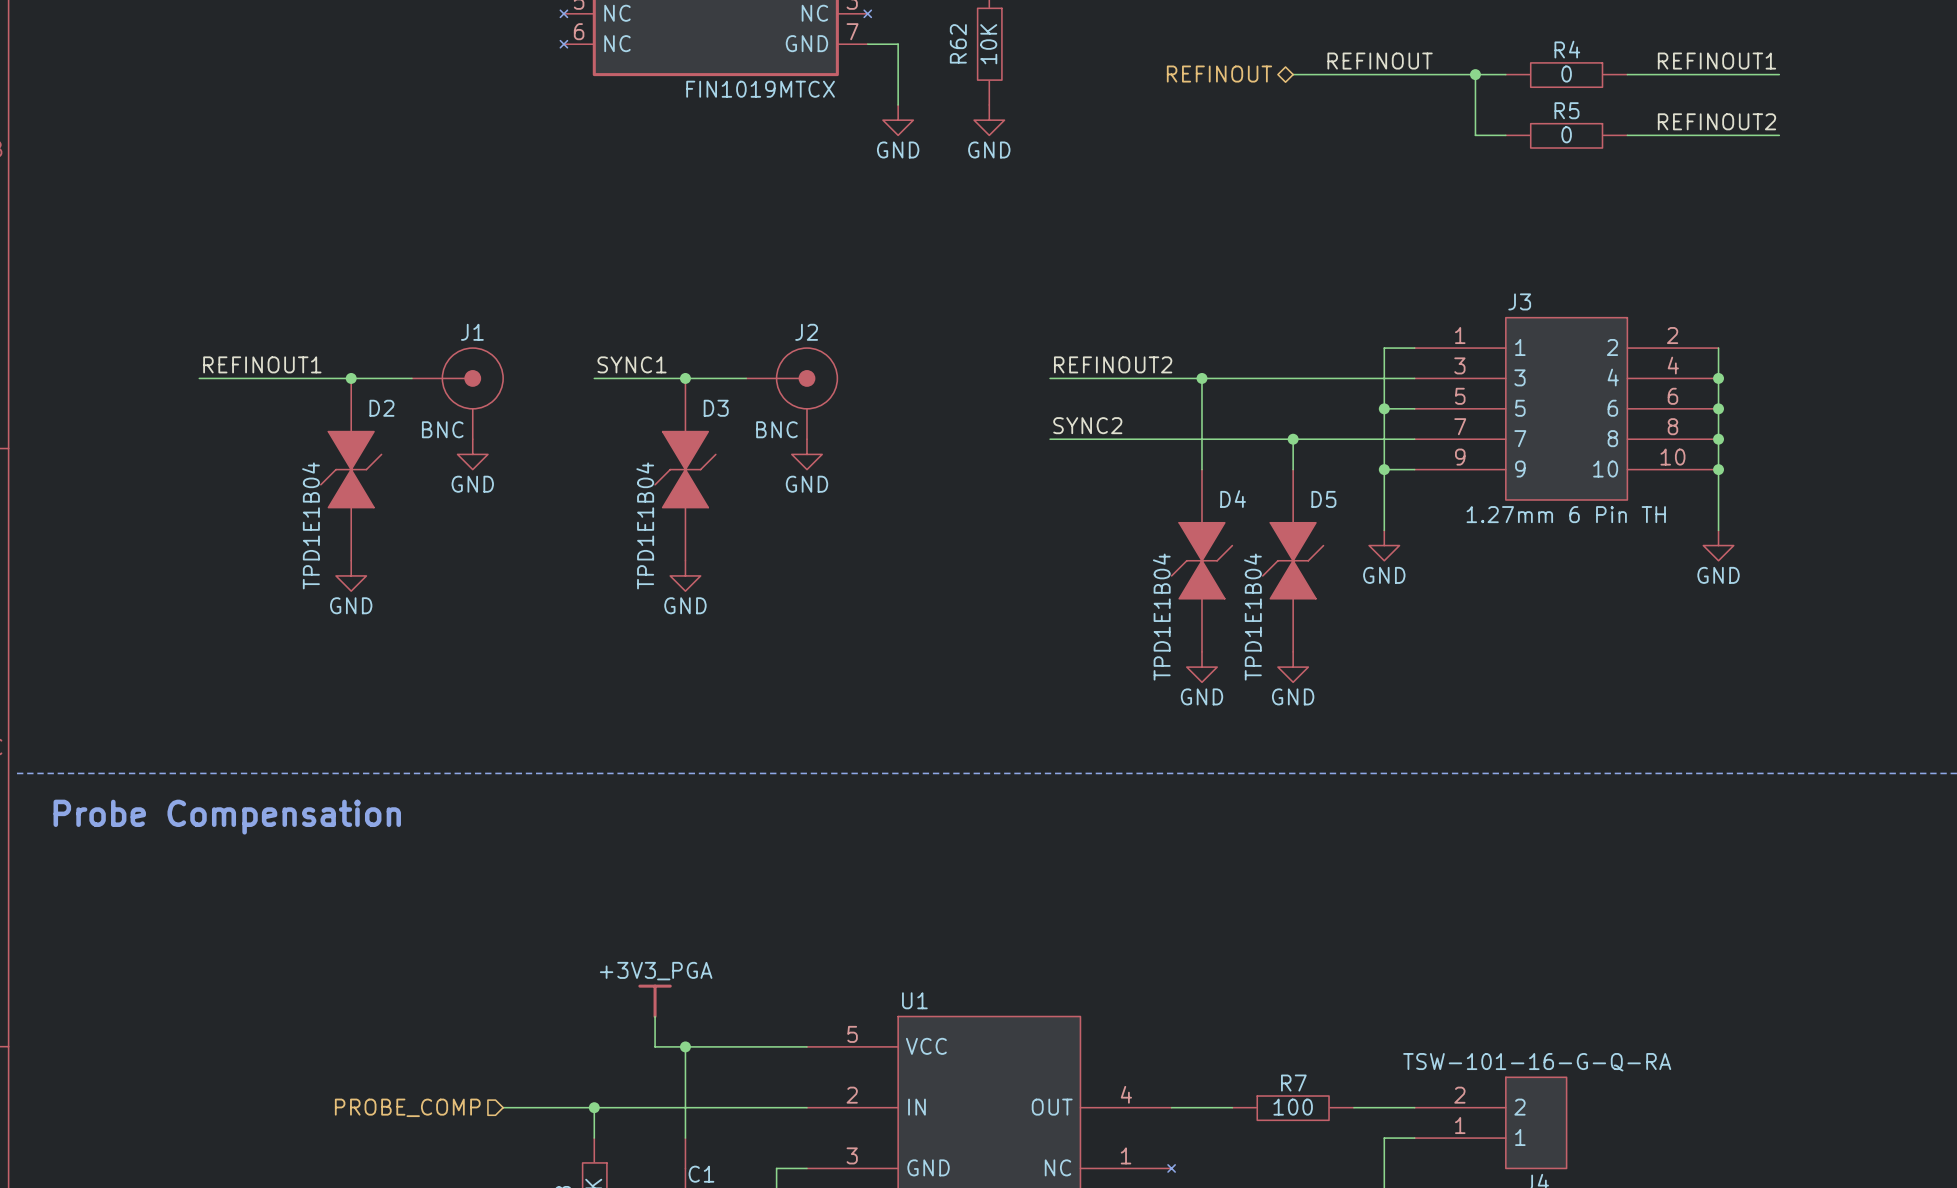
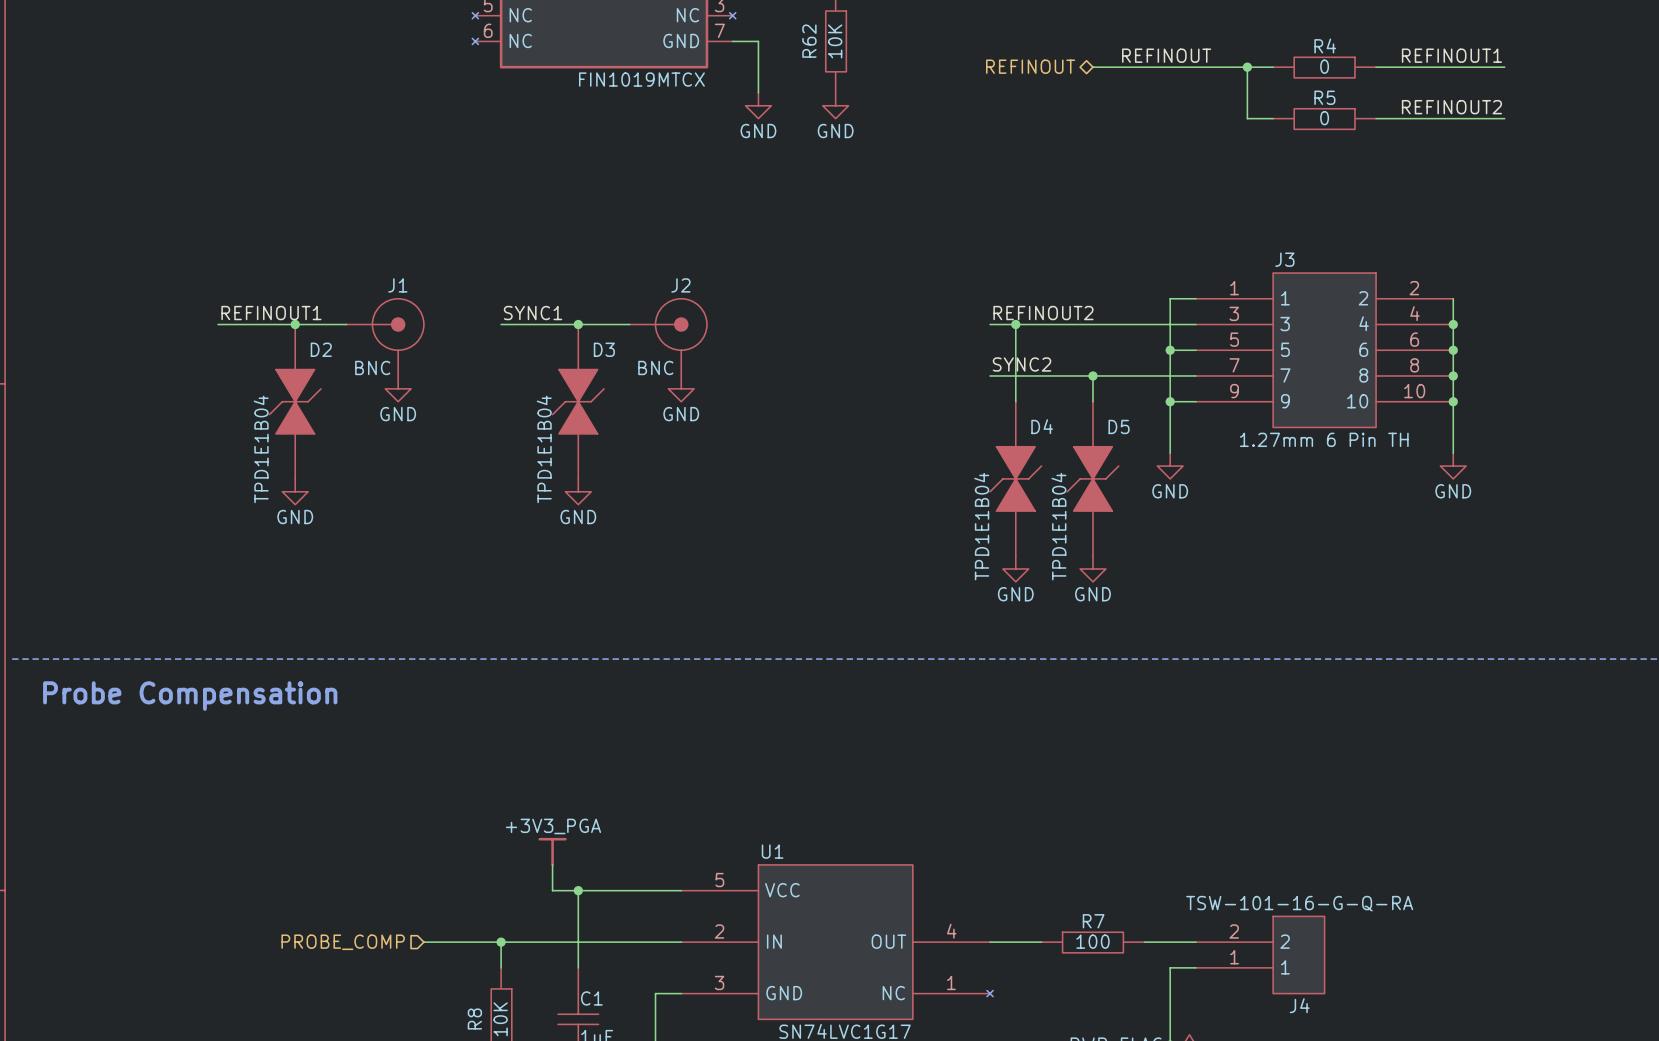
label position: REFINOUT1 (262, 364) -> REFINOUT1 (271, 313)
label position: REFINOUT2 (1113, 364) -> REFINOUT2 (1043, 313)
wire: (199, 378) (260, 378) -> none
wire: (1050, 378) (1171, 378) -> none
label position: SYNC2 (1087, 425) -> SYNC2 (1022, 364)
wire: (1050, 439) (1171, 439) -> none

